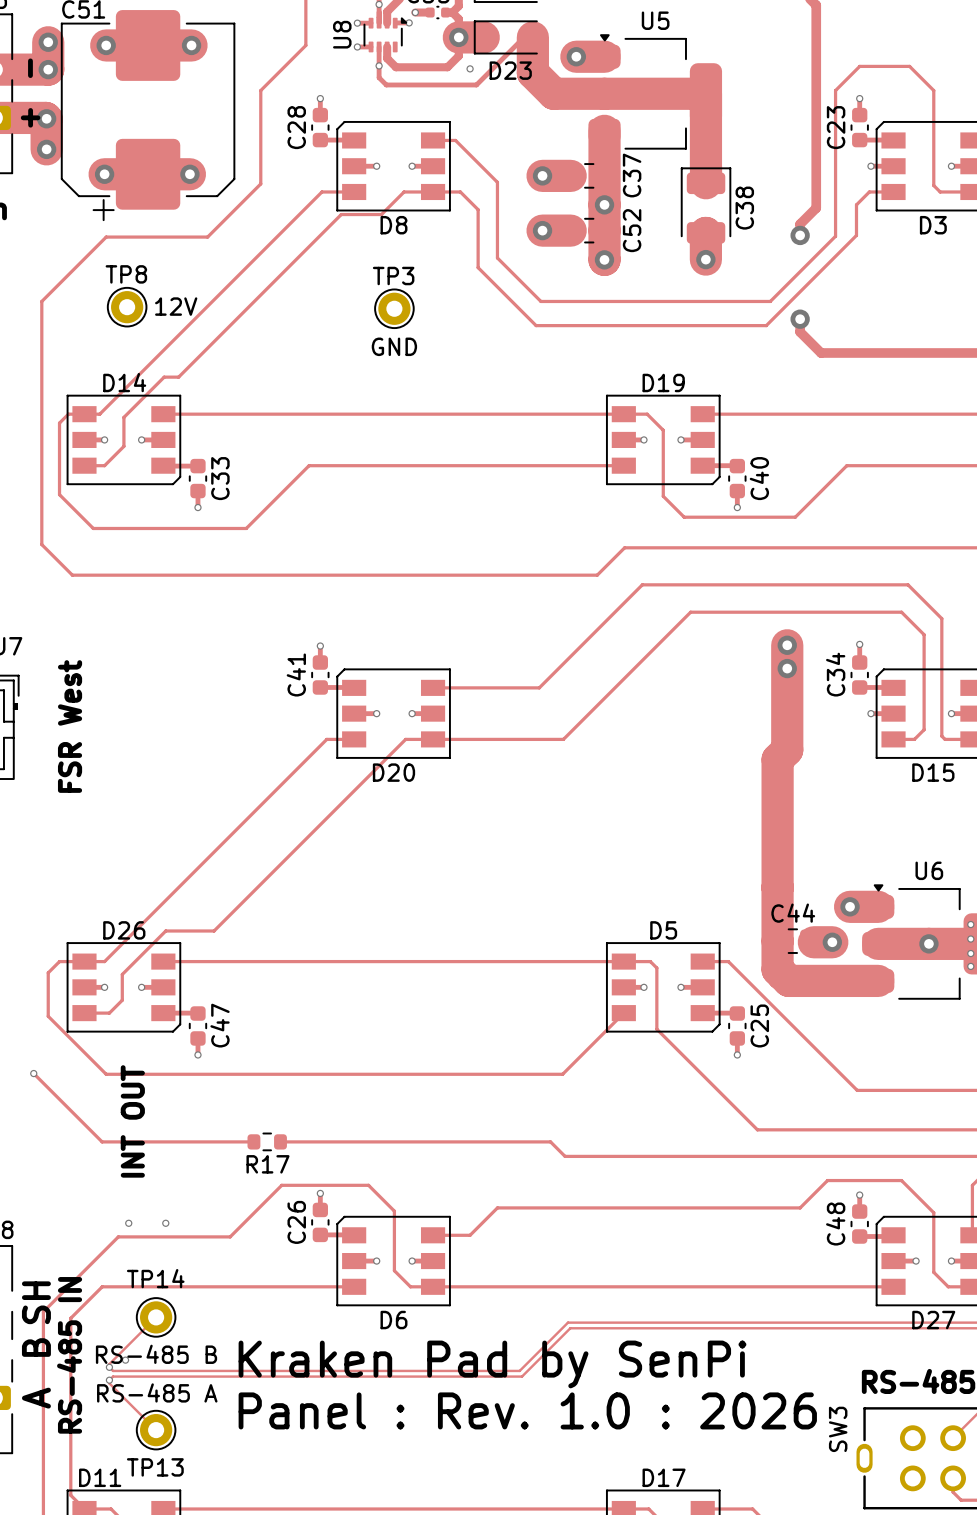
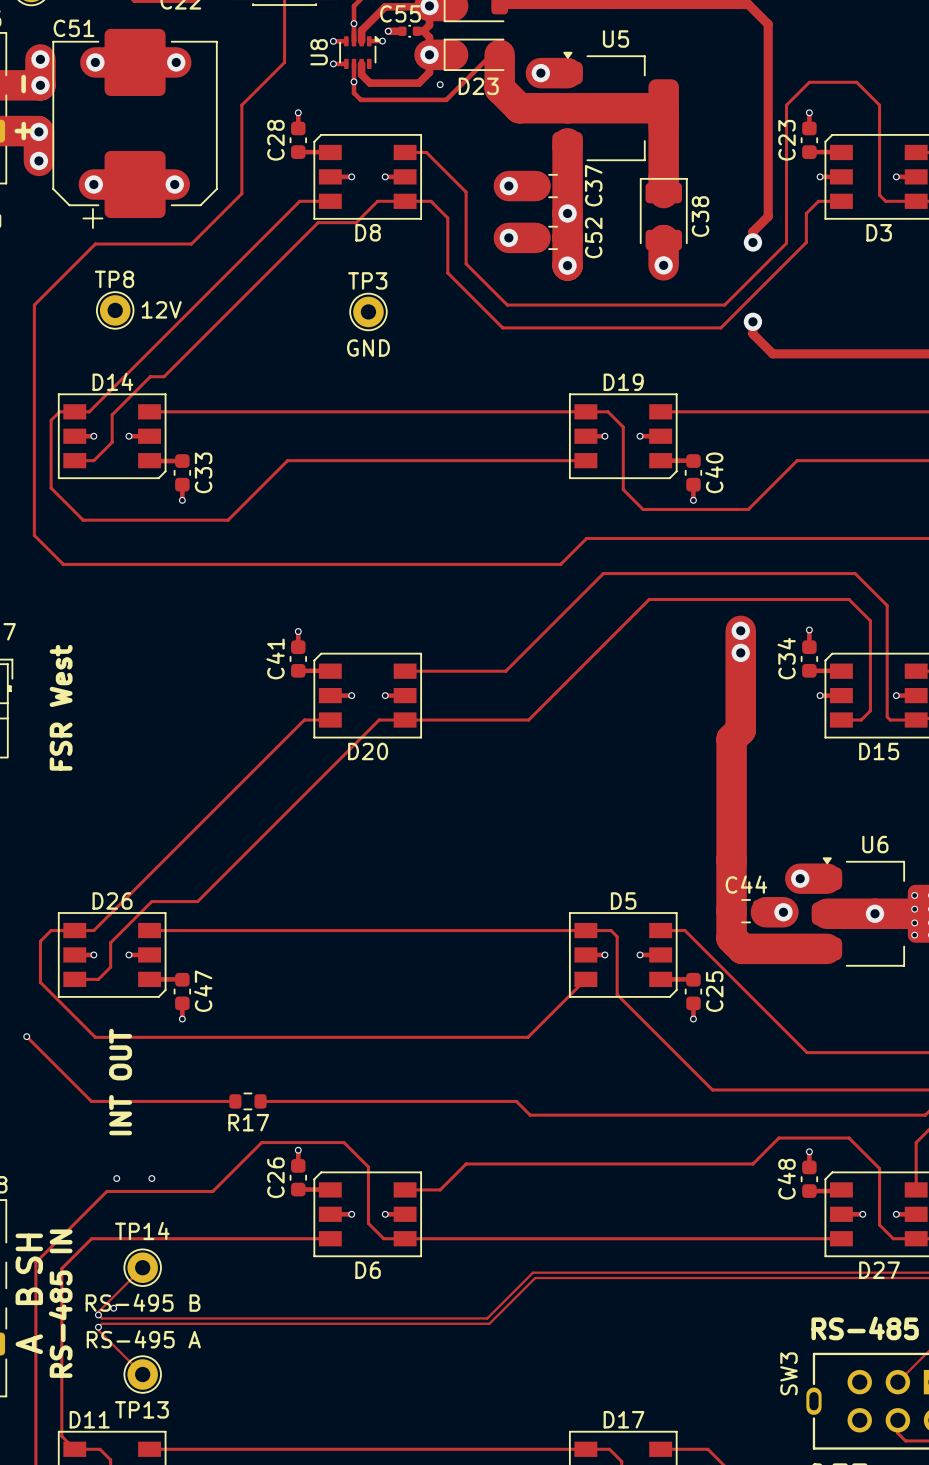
text: RS-485 B (156, 1354) -> RS-495 B (143, 1302)
text: Kraken Pad by SenPi (492, 1364) -> none
text: RS-485 A (157, 1392) -> RS-495 A (143, 1339)
text: Panel : Rev. 1.0 : 2026 (527, 1410) -> none

